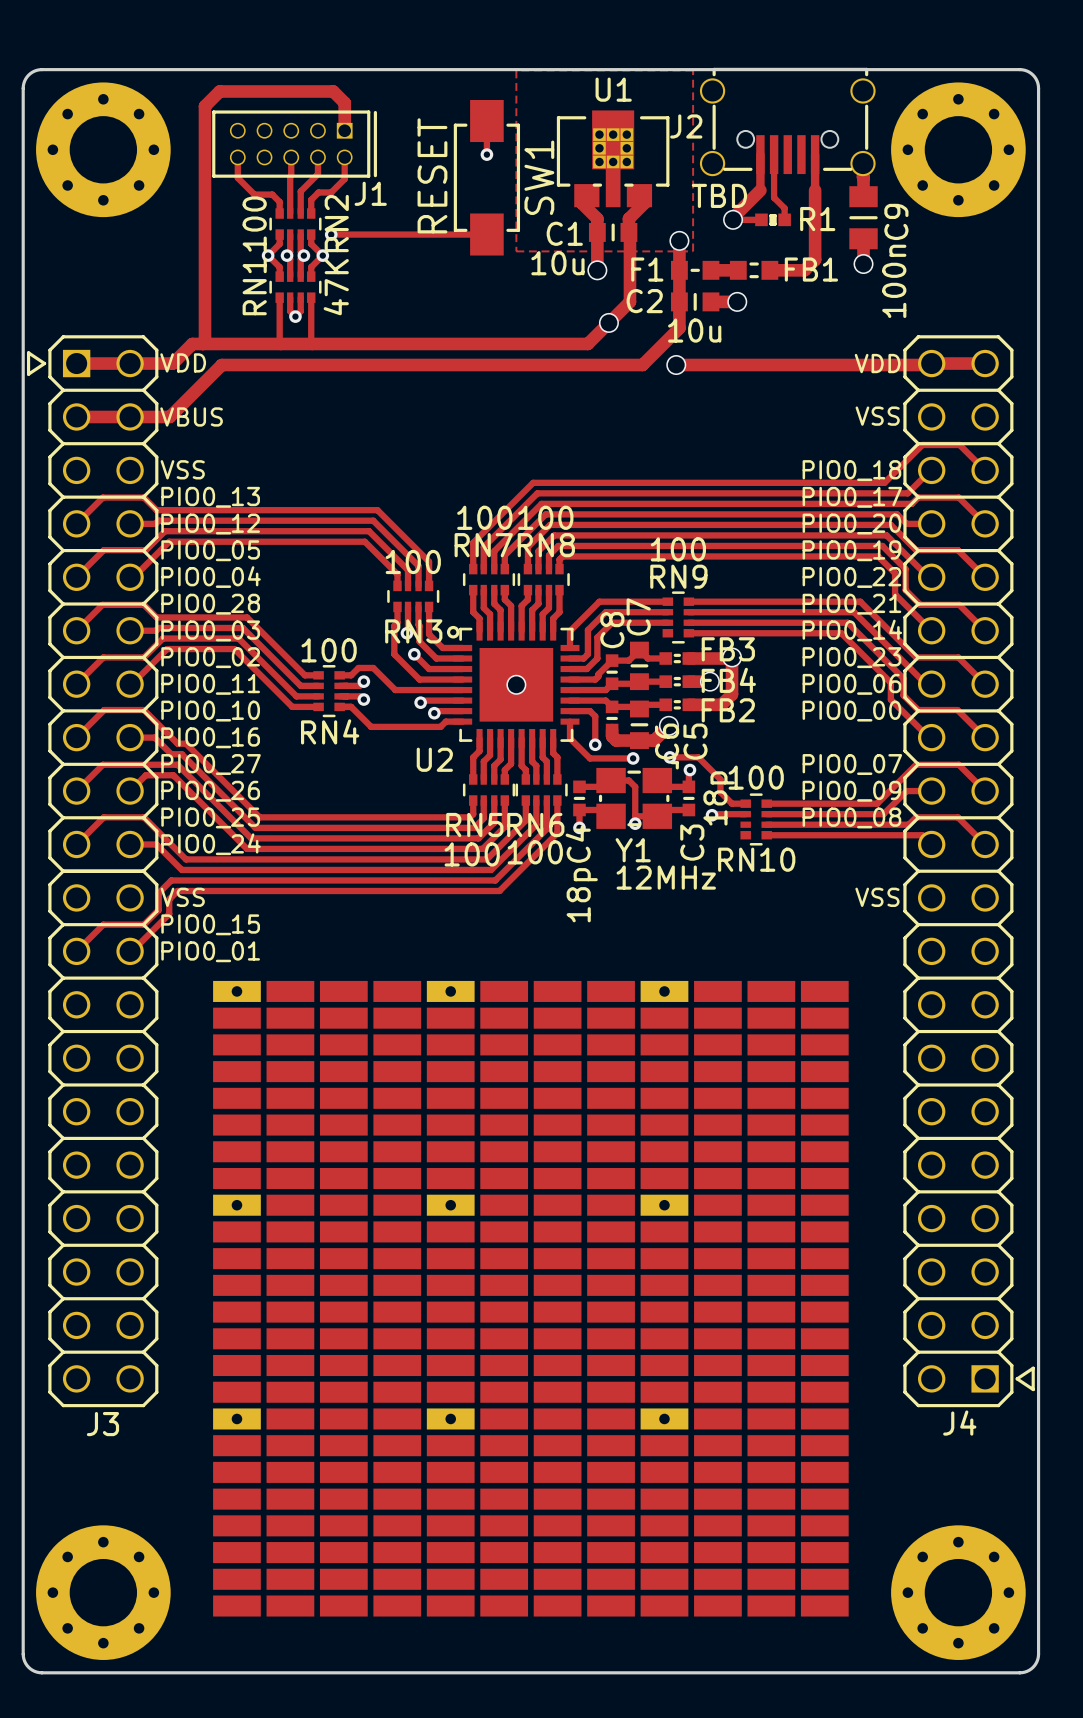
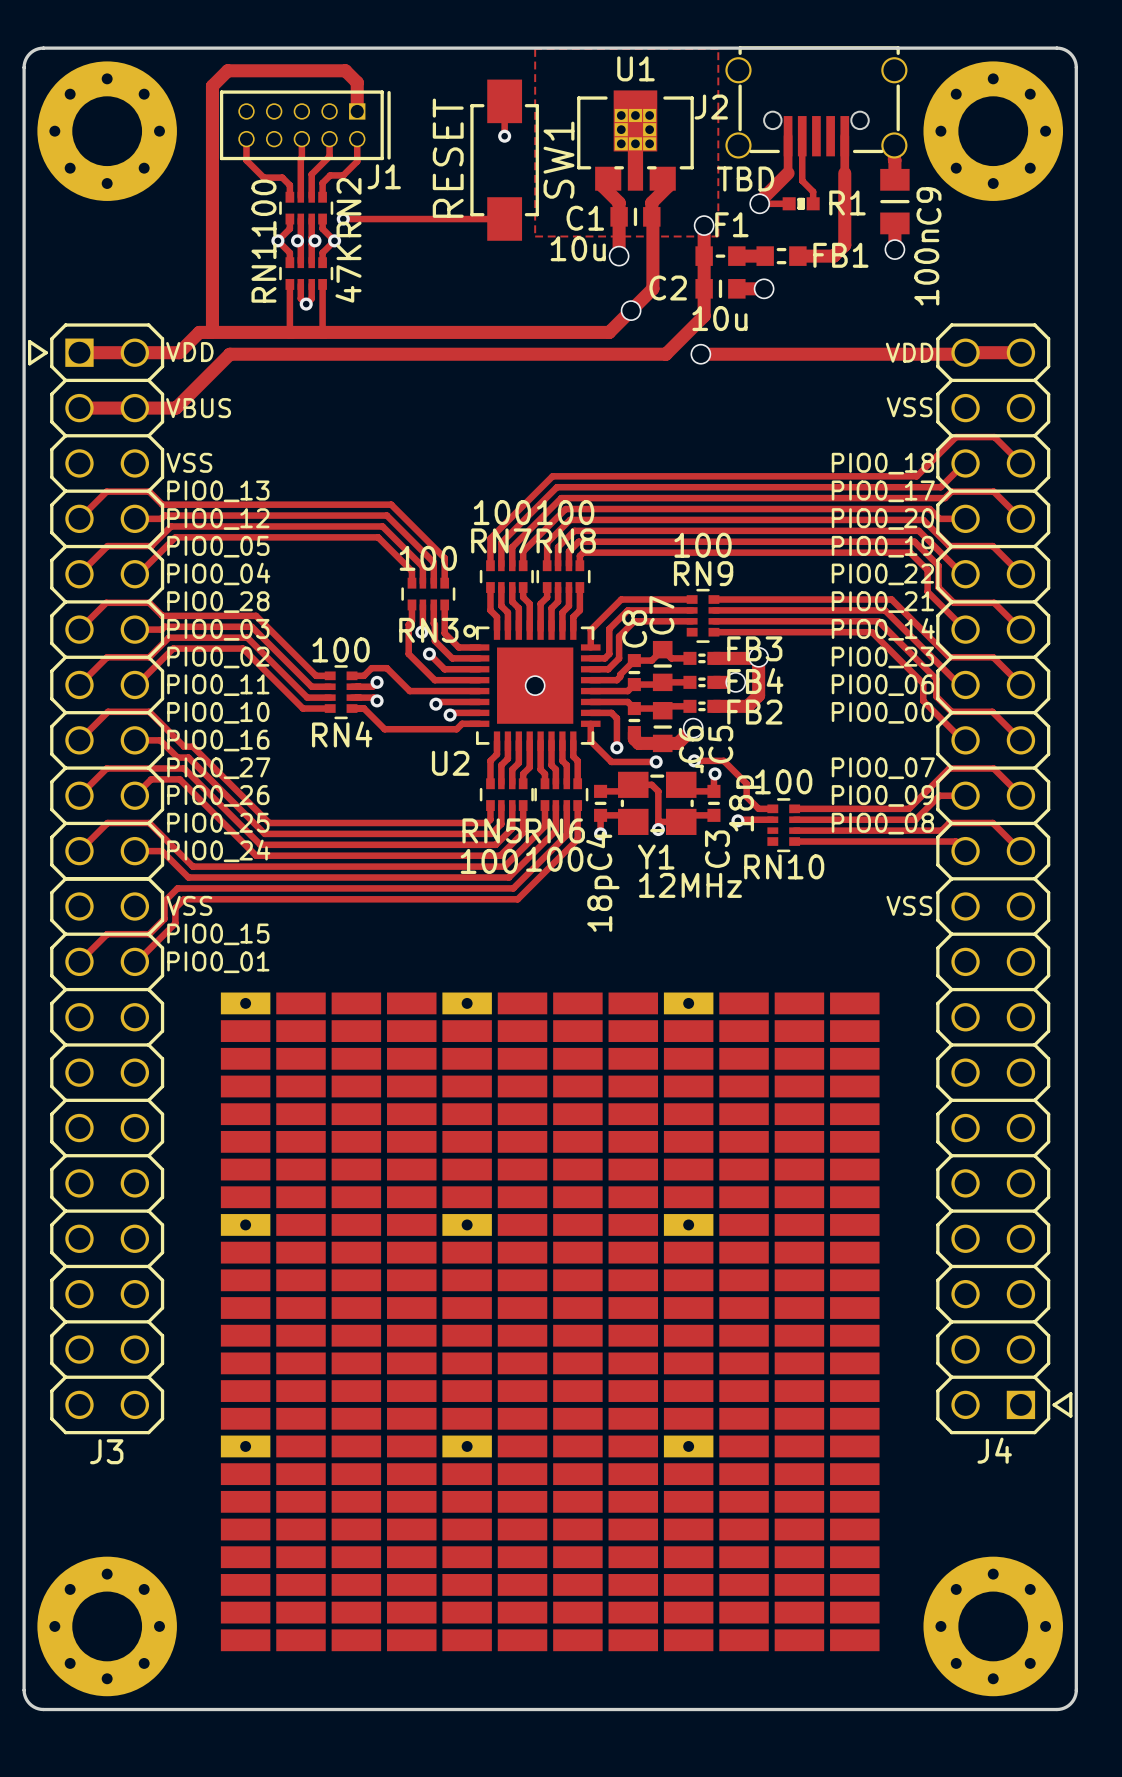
F1 name position: F1 (647, 269) -> F1 (731, 224)

